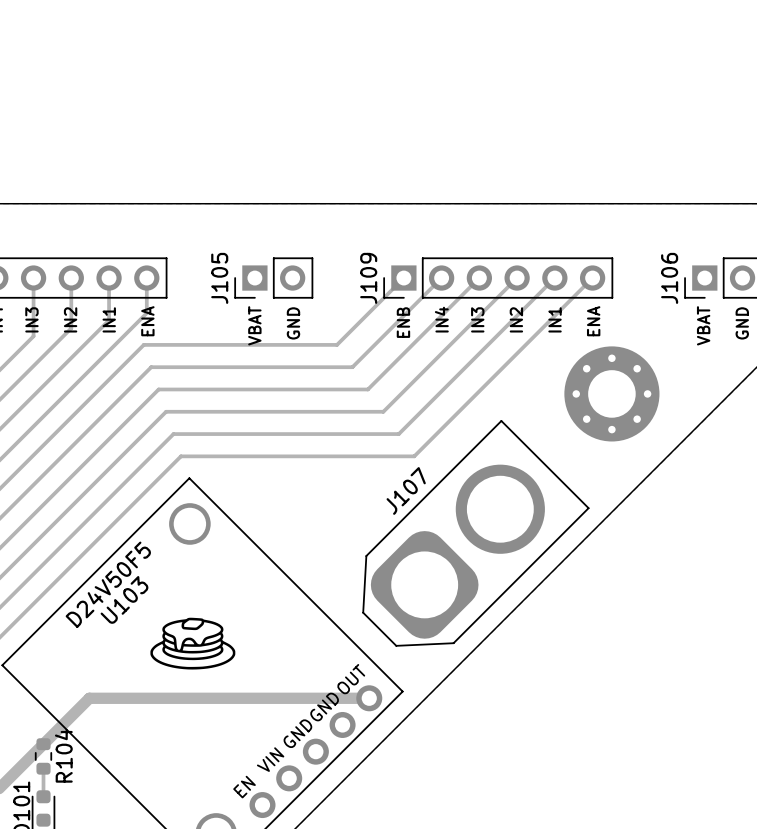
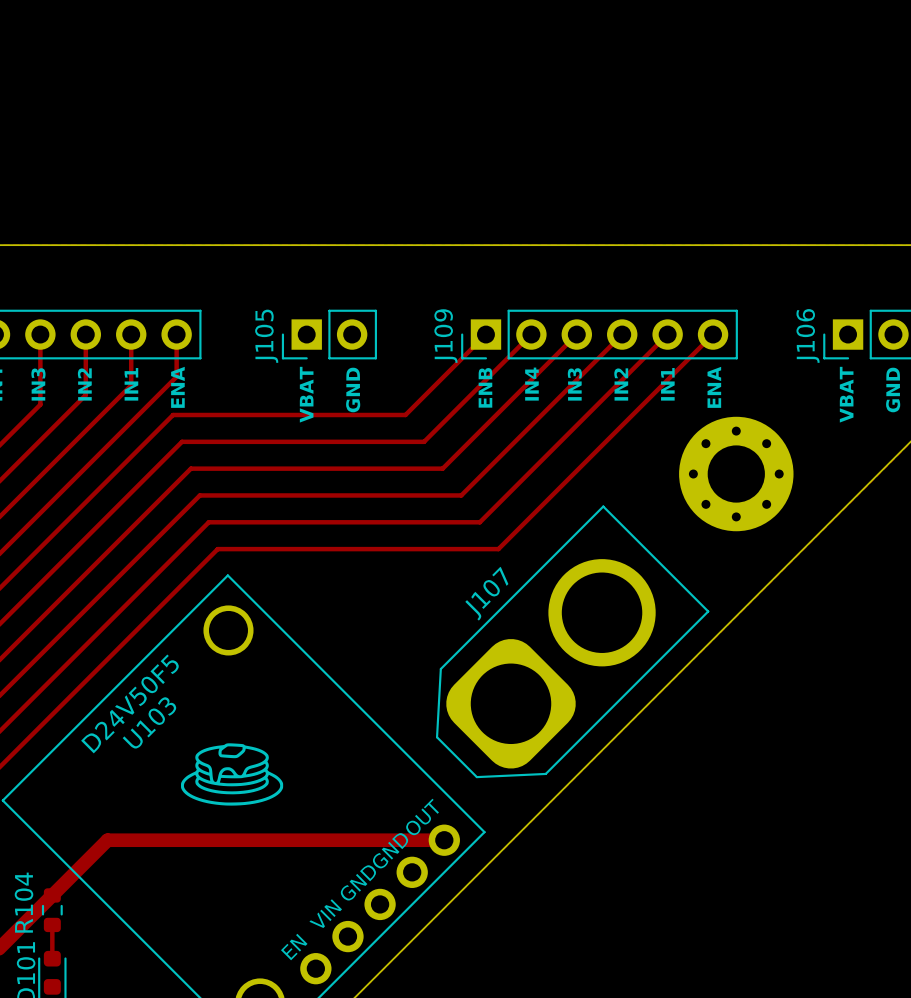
R104 name position: R104 (63, 755) -> R104 (24, 902)

